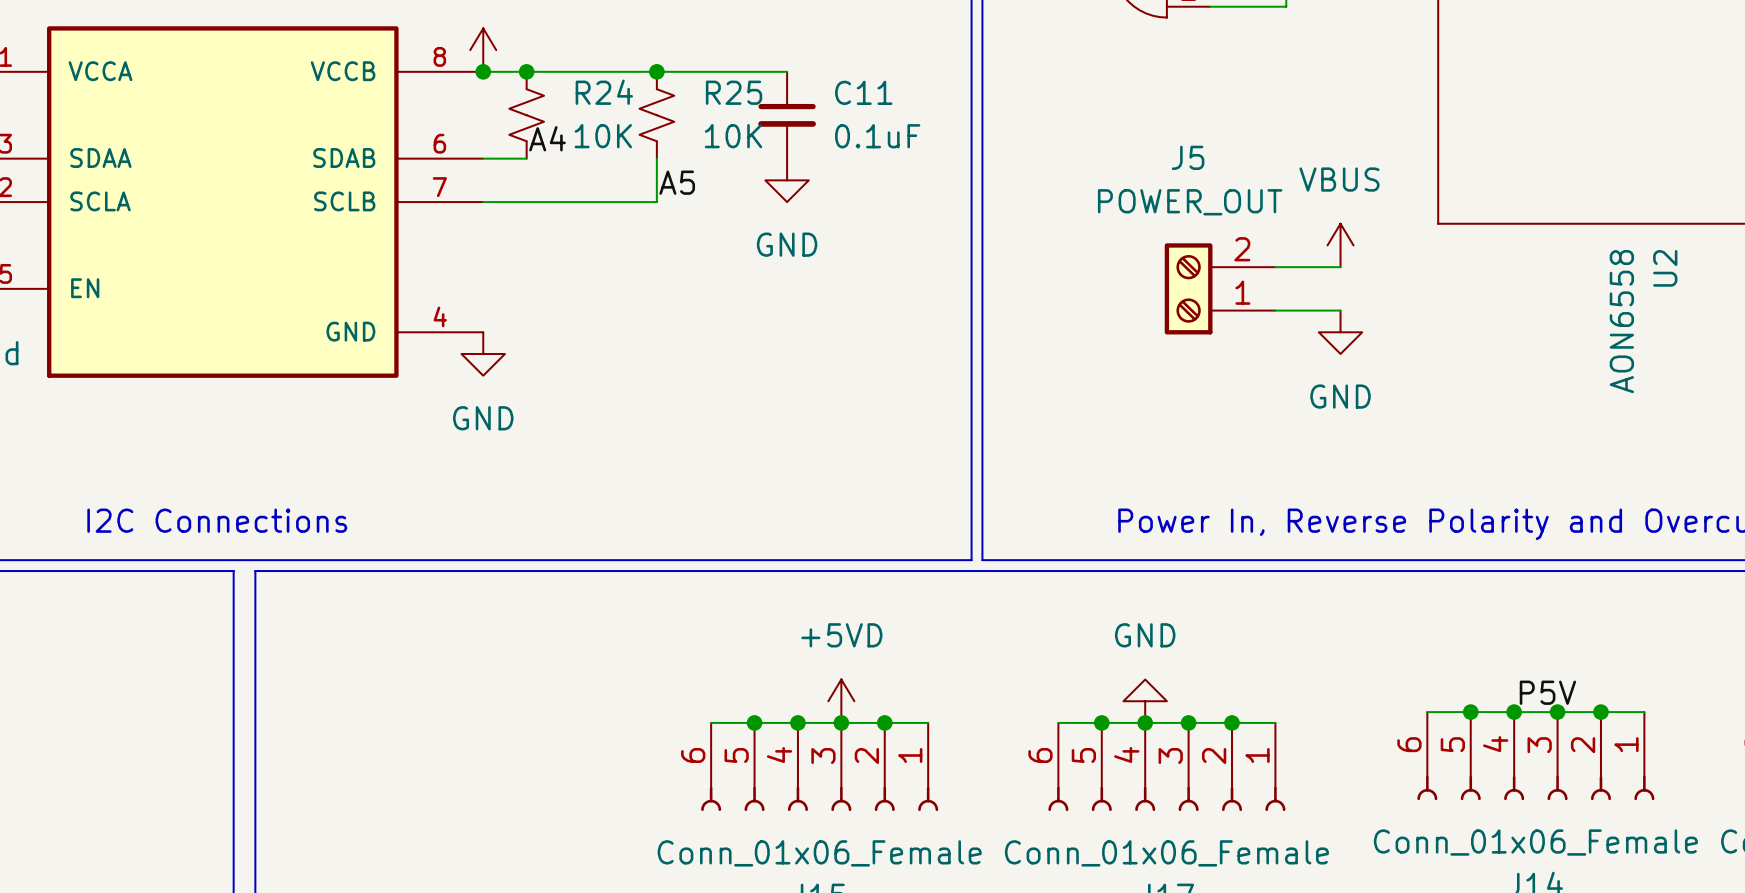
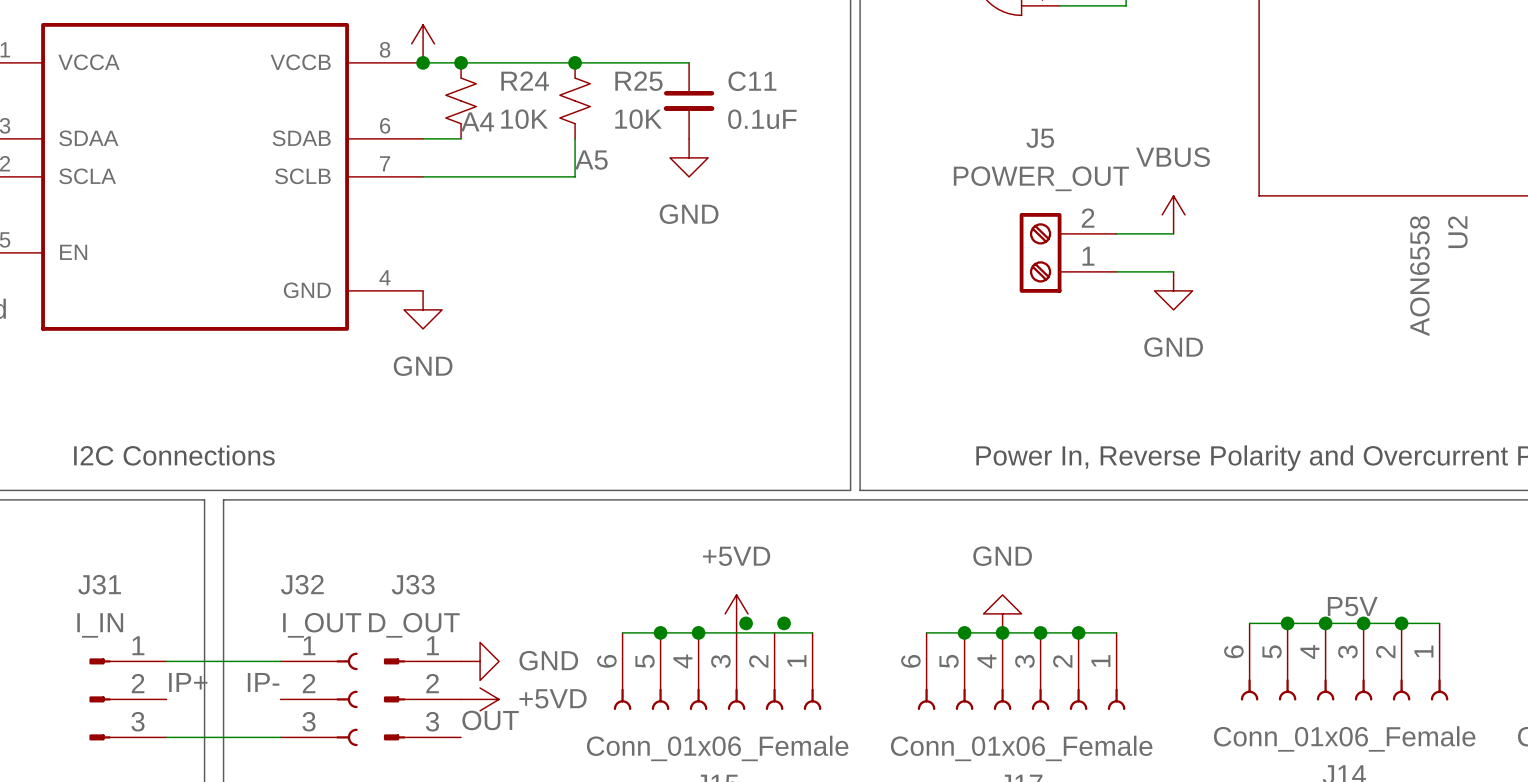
junction position: (841, 722) -> (746, 623)
junction position: (884, 722) -> (784, 623)
wire: none -> (166, 661) (280, 661)
power symbol: none -> GND (480, 661)
label: none -> IP+ (188, 682)
label: none -> IP- (263, 682)
J31: none -> I_IN (127, 699)
J32: none -> I_OUT (319, 699)
J33: none -> D_OUT (422, 699)
power symbol: none -> +5VD (480, 699)
label: none -> OUT (490, 720)
wire: none -> (166, 737) (280, 737)

